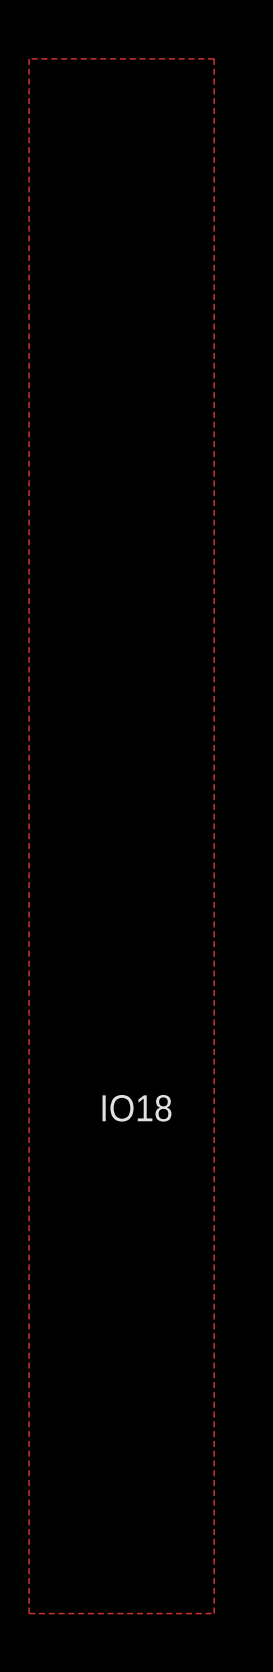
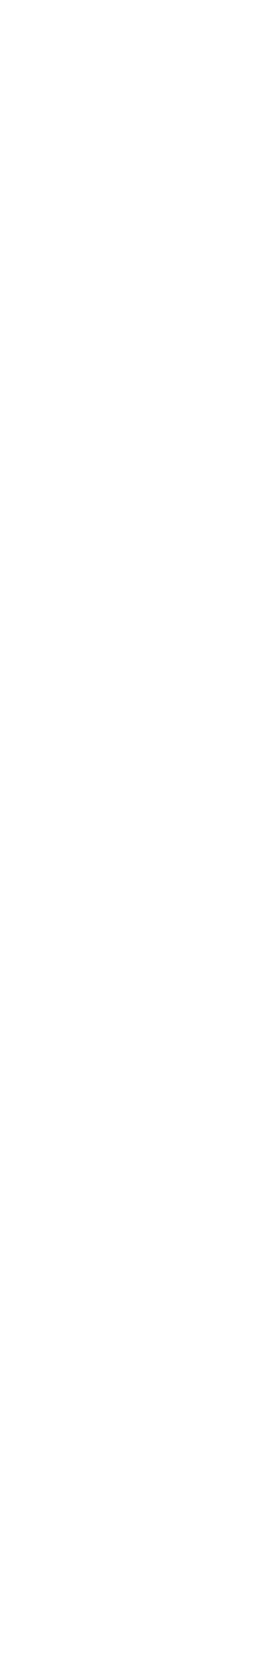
zone outline: (29, 58) (214, 58) (214, 1613) (29, 1613) (29, 58) -> none
text: IO18 (136, 1108) -> none

